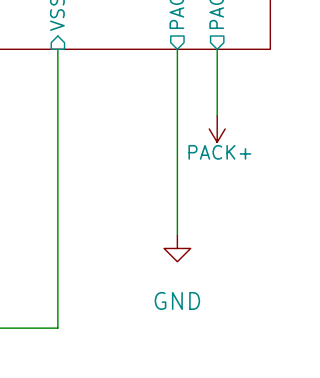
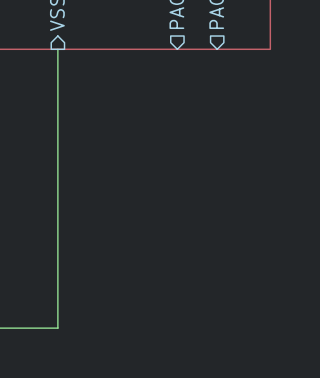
wire: (177, 49) (177, 235) -> none
wire: (217, 49) (217, 115) -> none
power symbol: PACK+ (217, 128) -> none
power symbol: GND (177, 248) -> none

